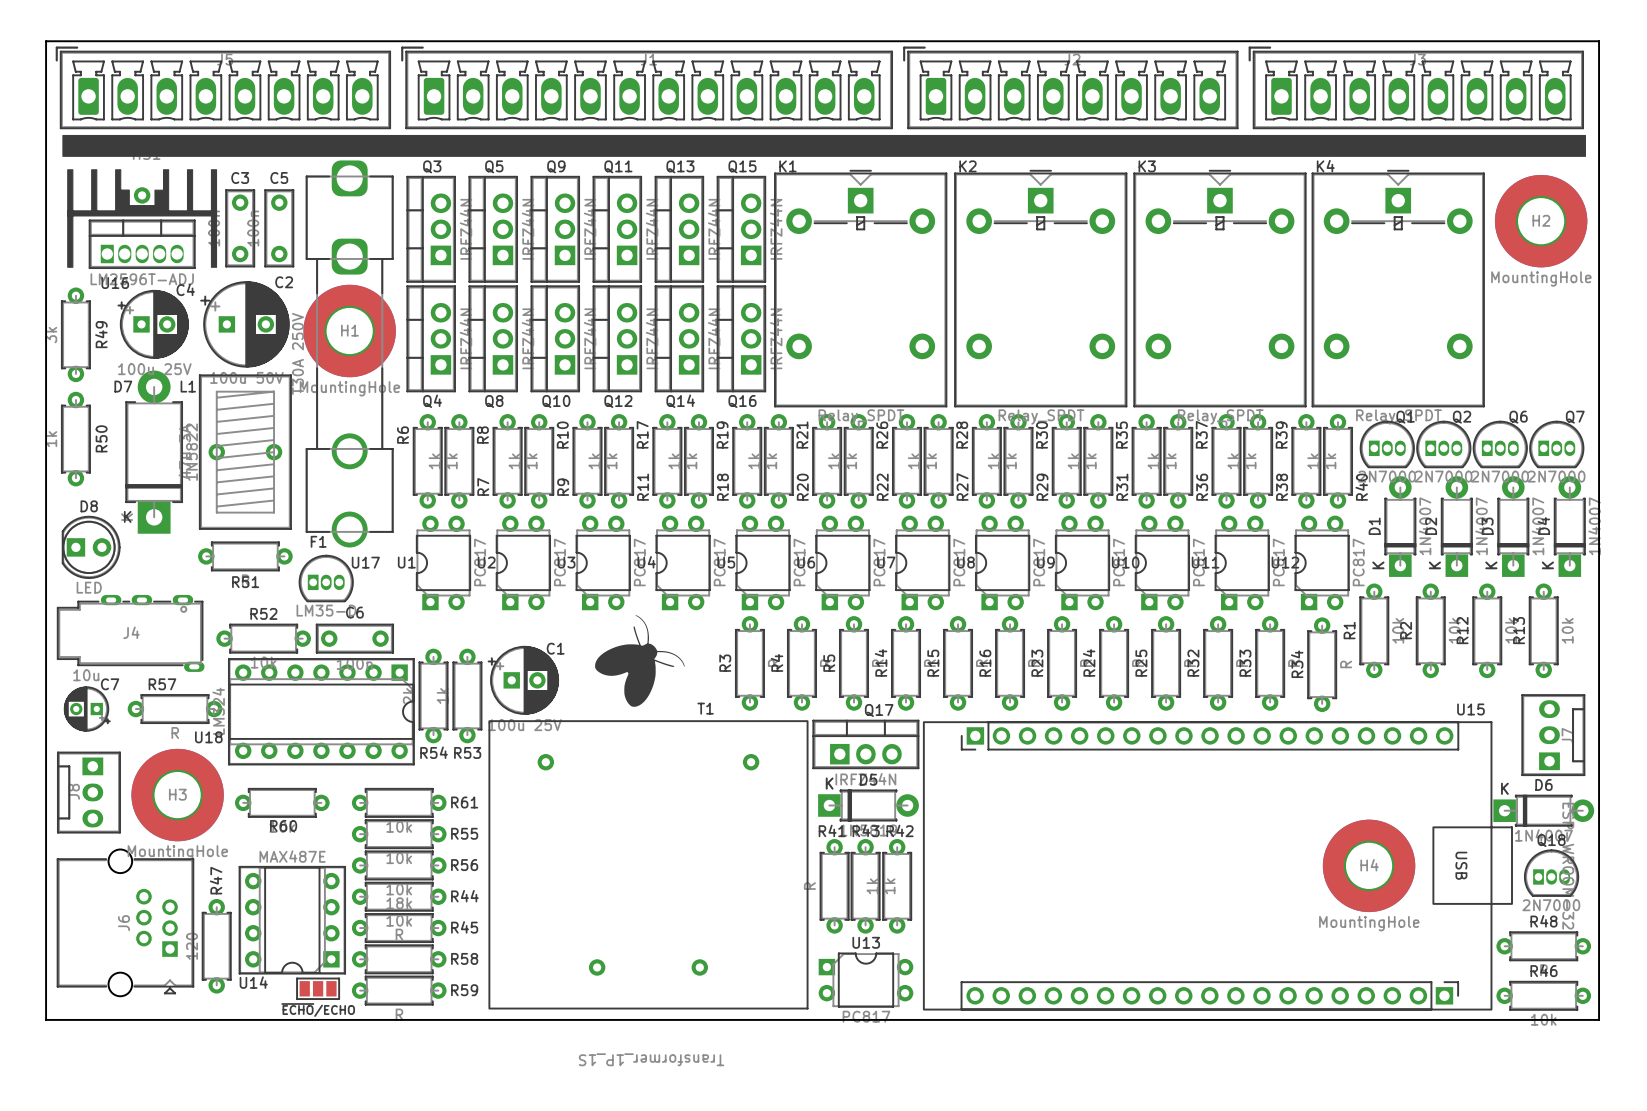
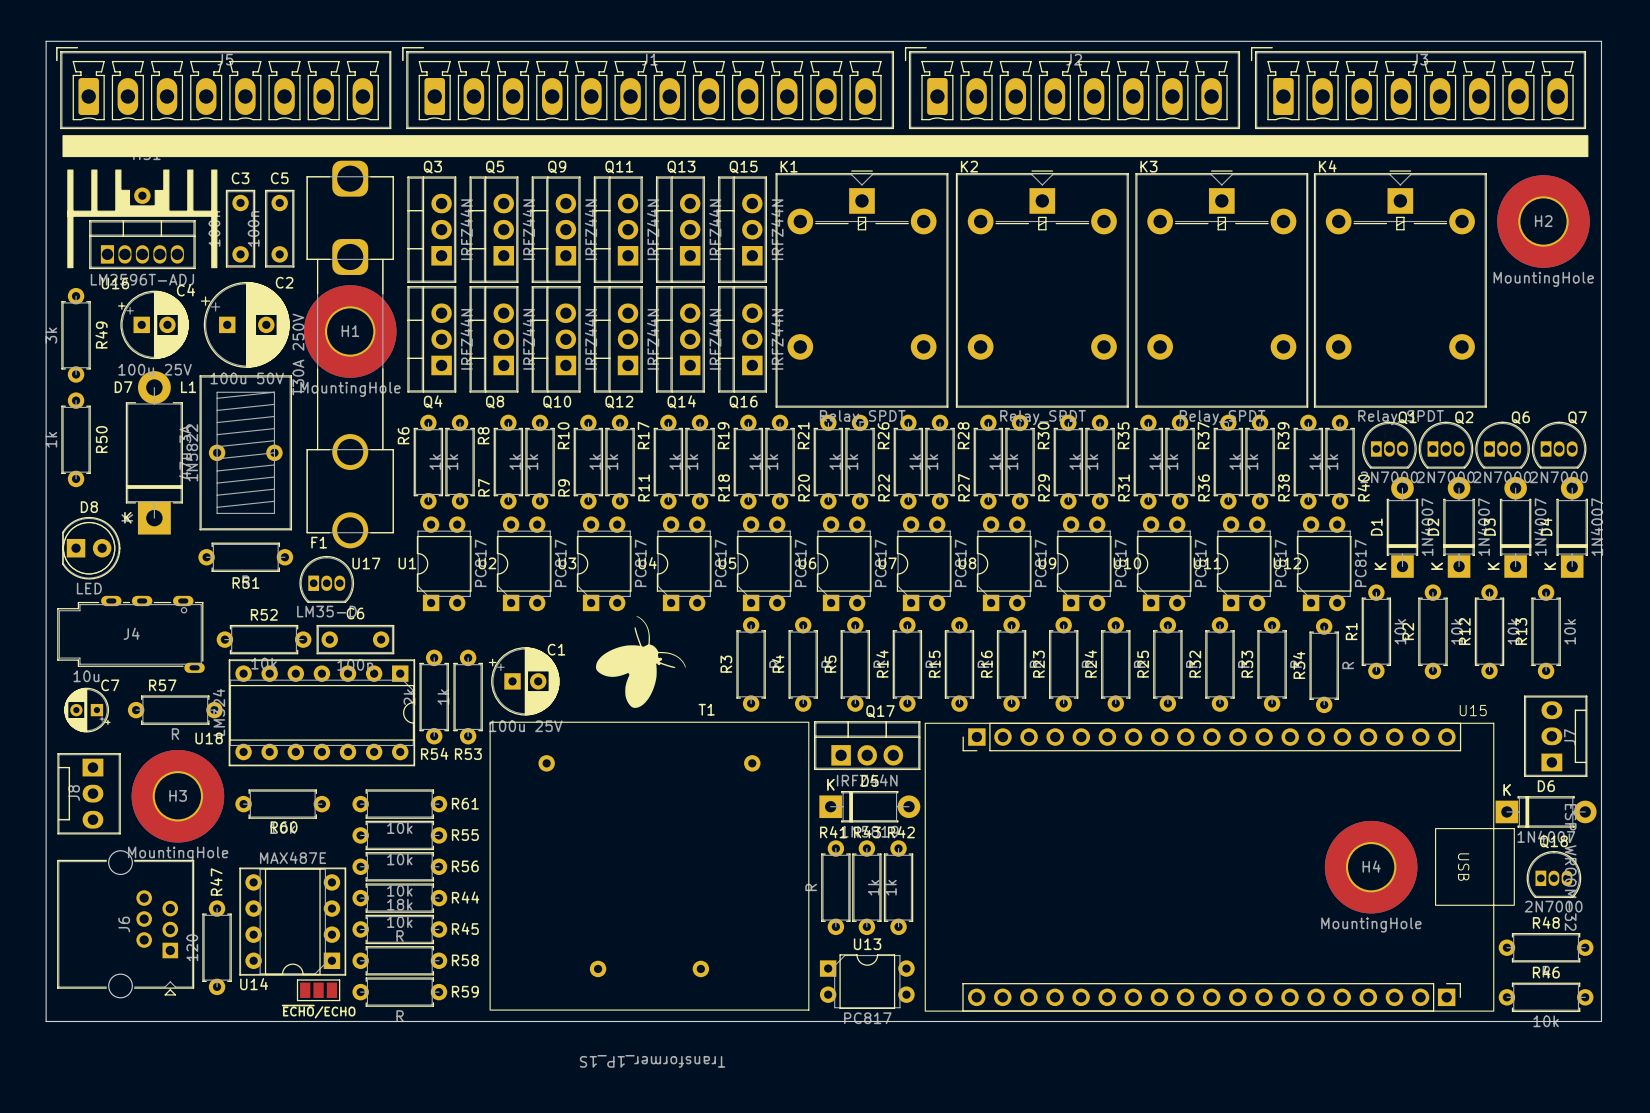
drawing: [595, 615, 685, 707] -> none
part: none -> (640, 662)

